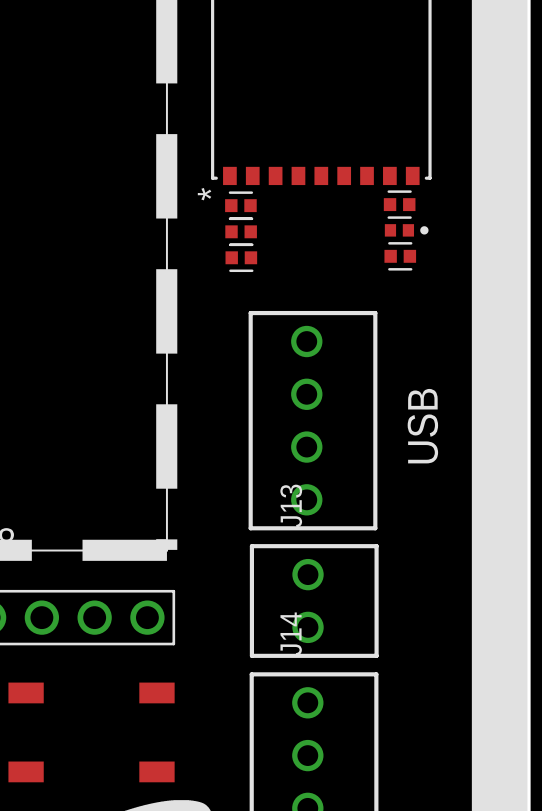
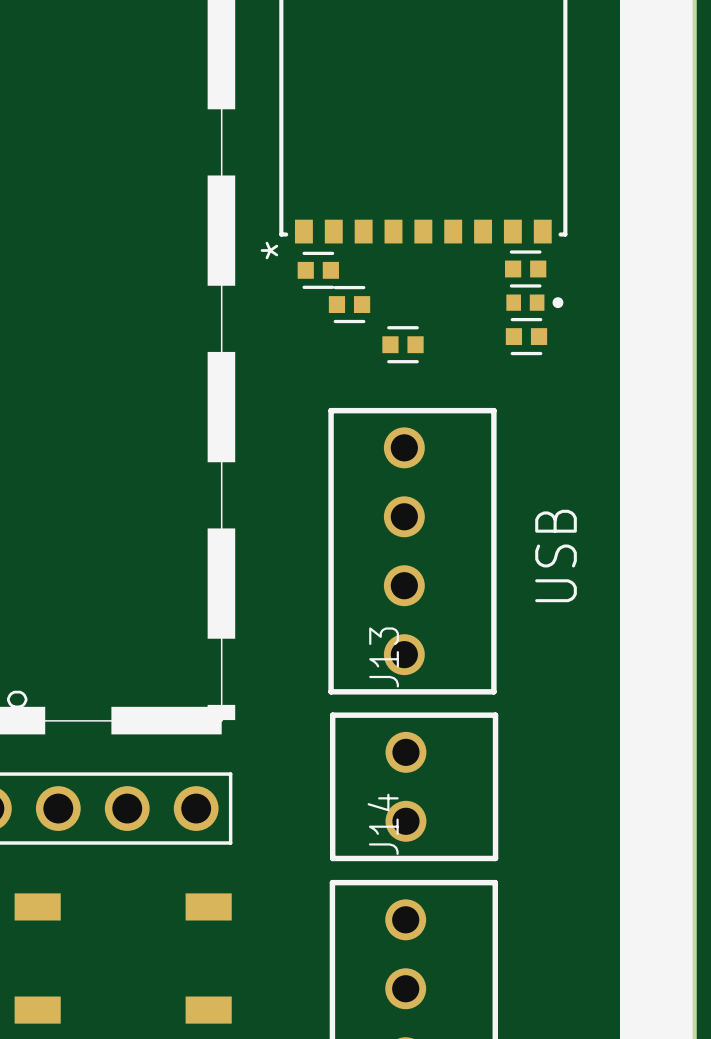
part: (241, 231) -> none
part: none -> (349, 304)
part: (241, 257) -> none
part: none -> (402, 344)

